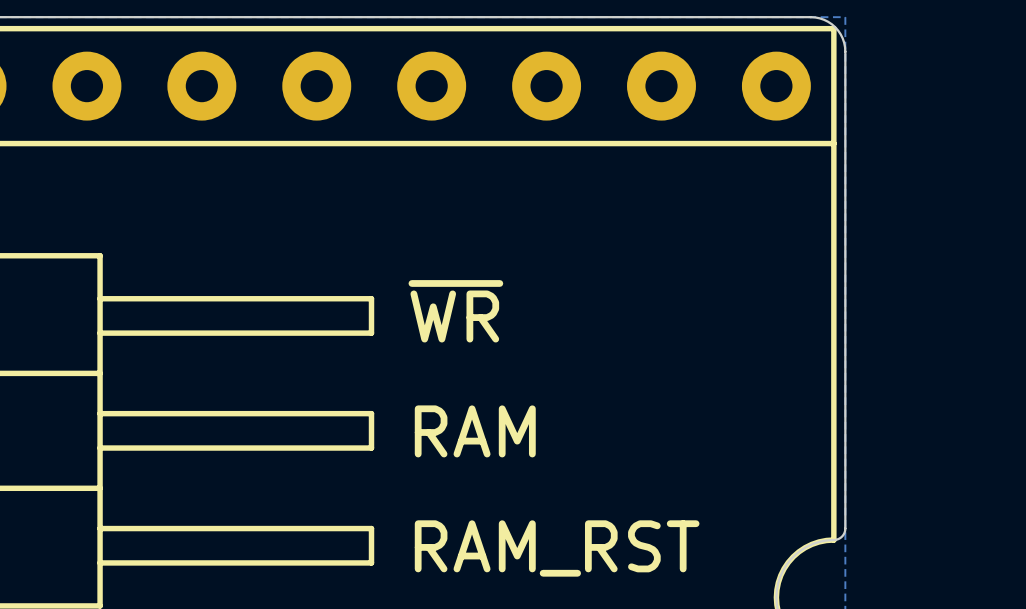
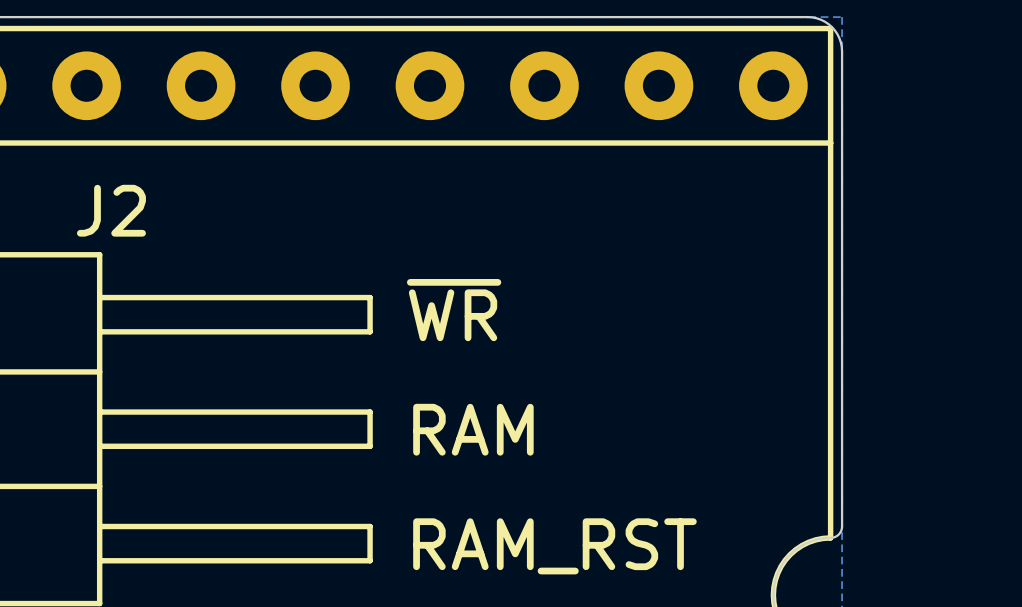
J2 name: none -> J2 (111, 210)

